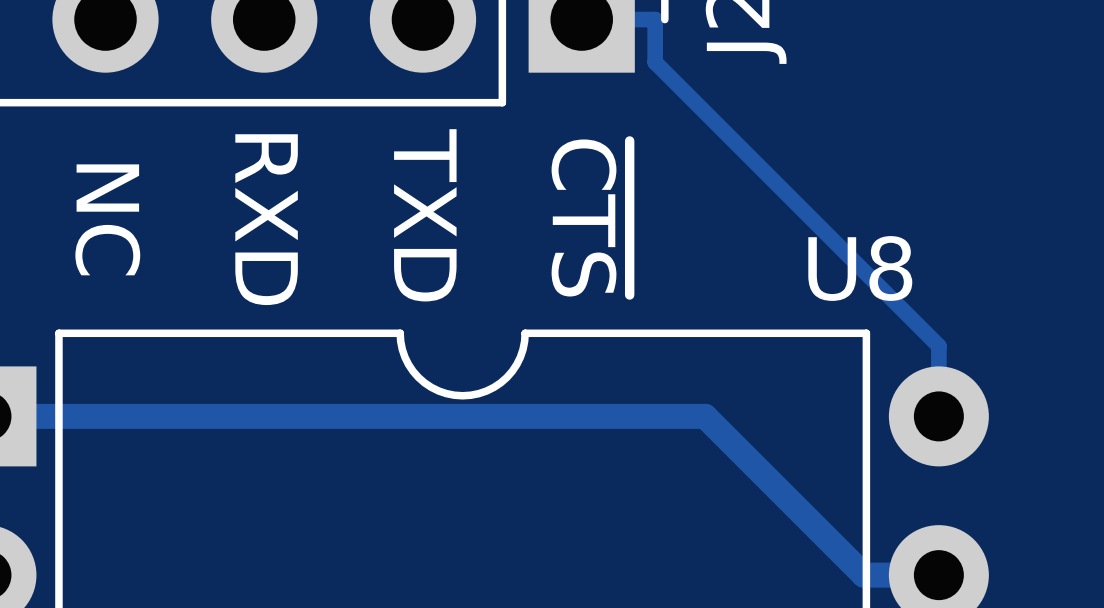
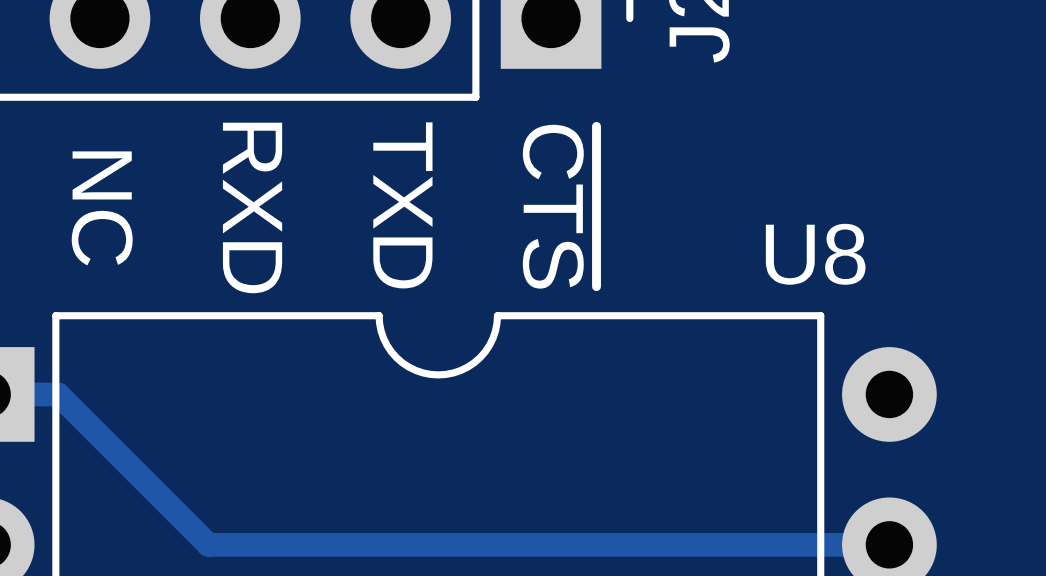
track: (581, 19) (655, 19) (655, 62) (938, 346) (938, 416) -> none
track: (61, 416) (705, 416) (863, 575) -> (58, 394) (208, 544) (818, 544)

